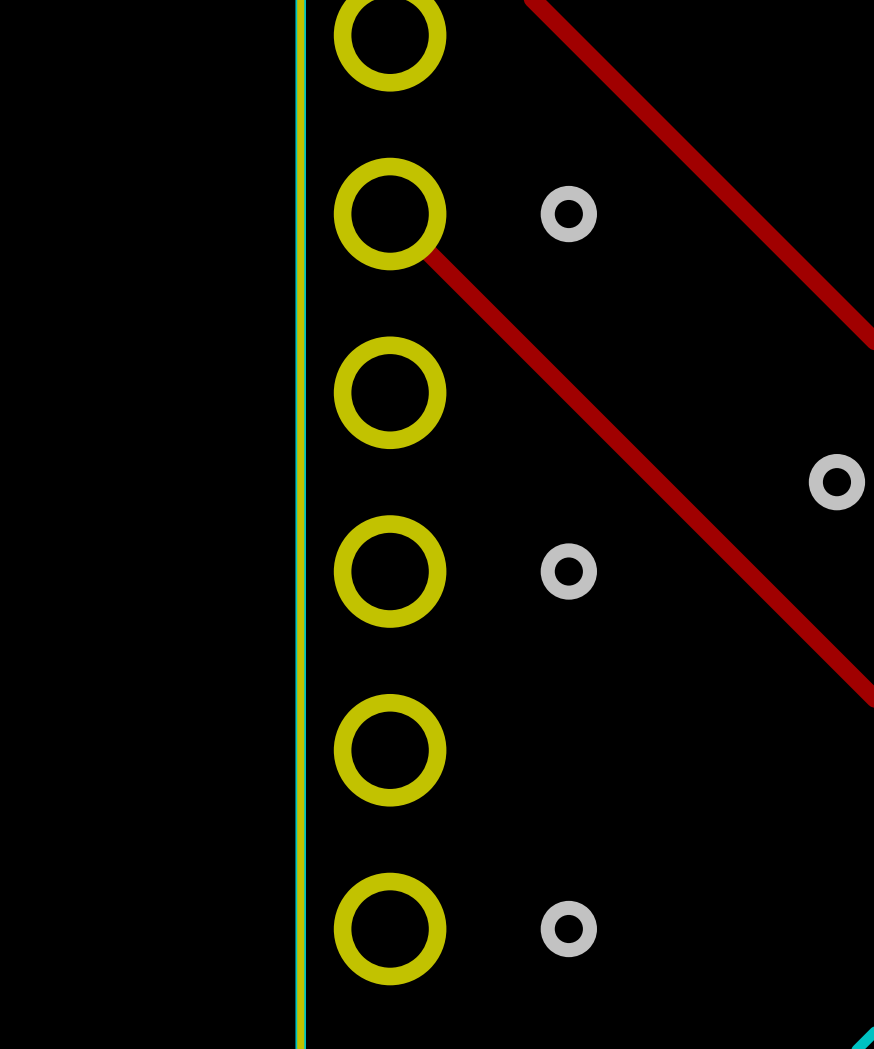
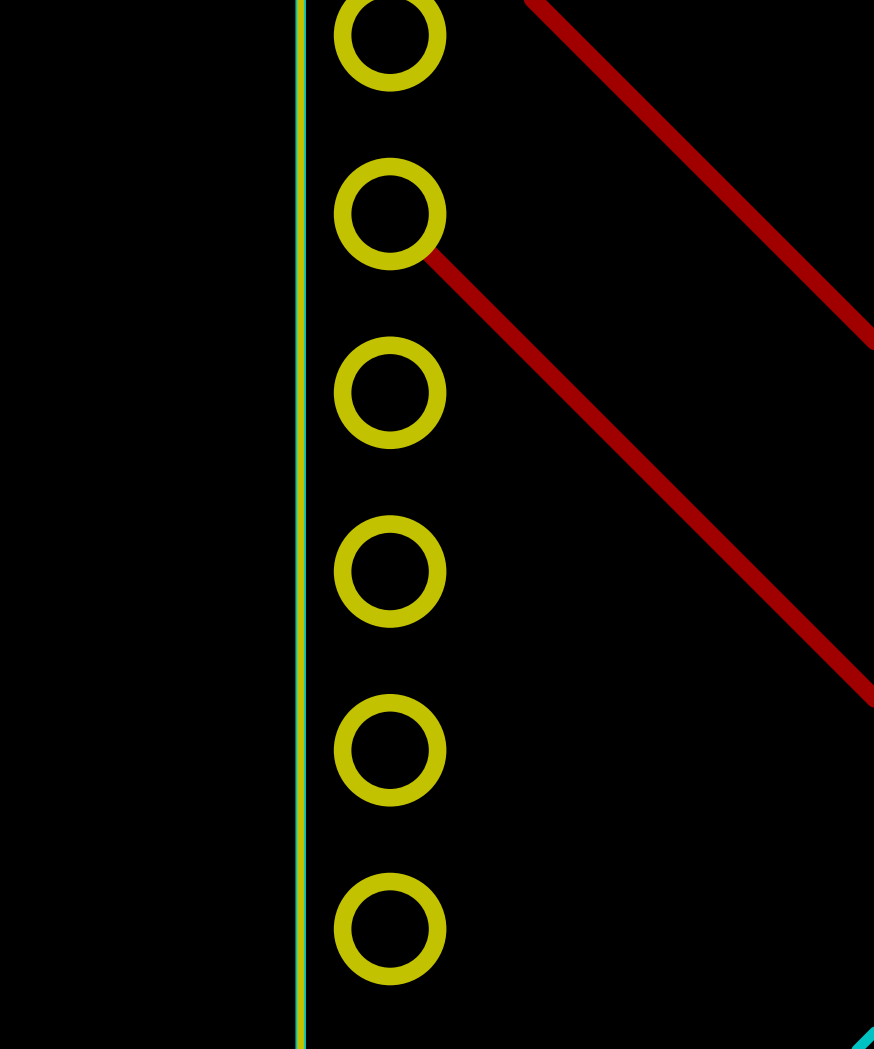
via: (568, 214) -> none
via: (836, 482) -> none
via: (568, 571) -> none
via: (568, 929) -> none

